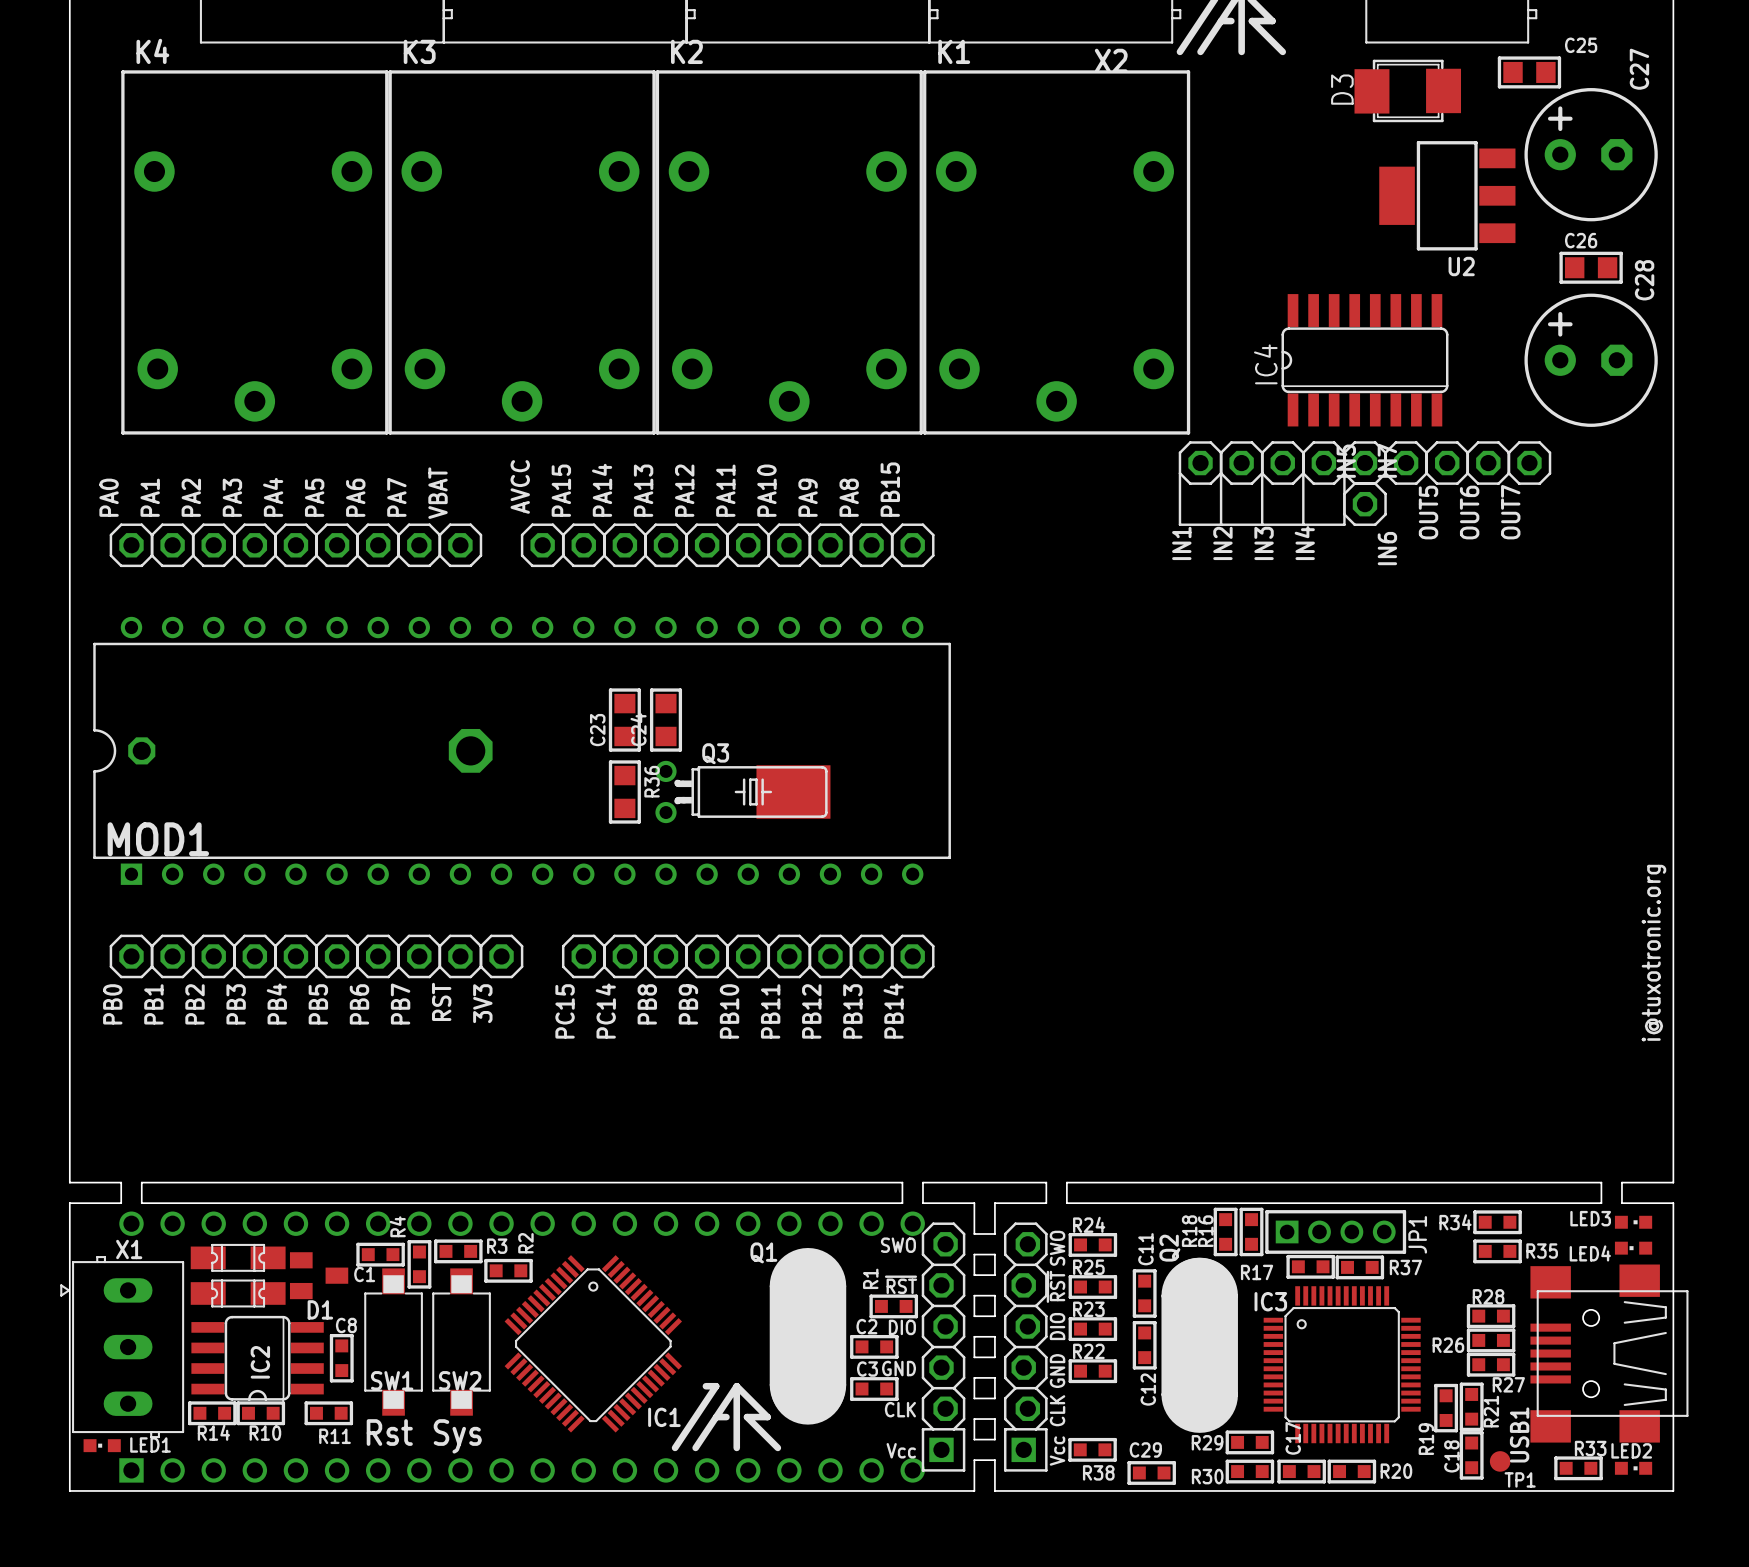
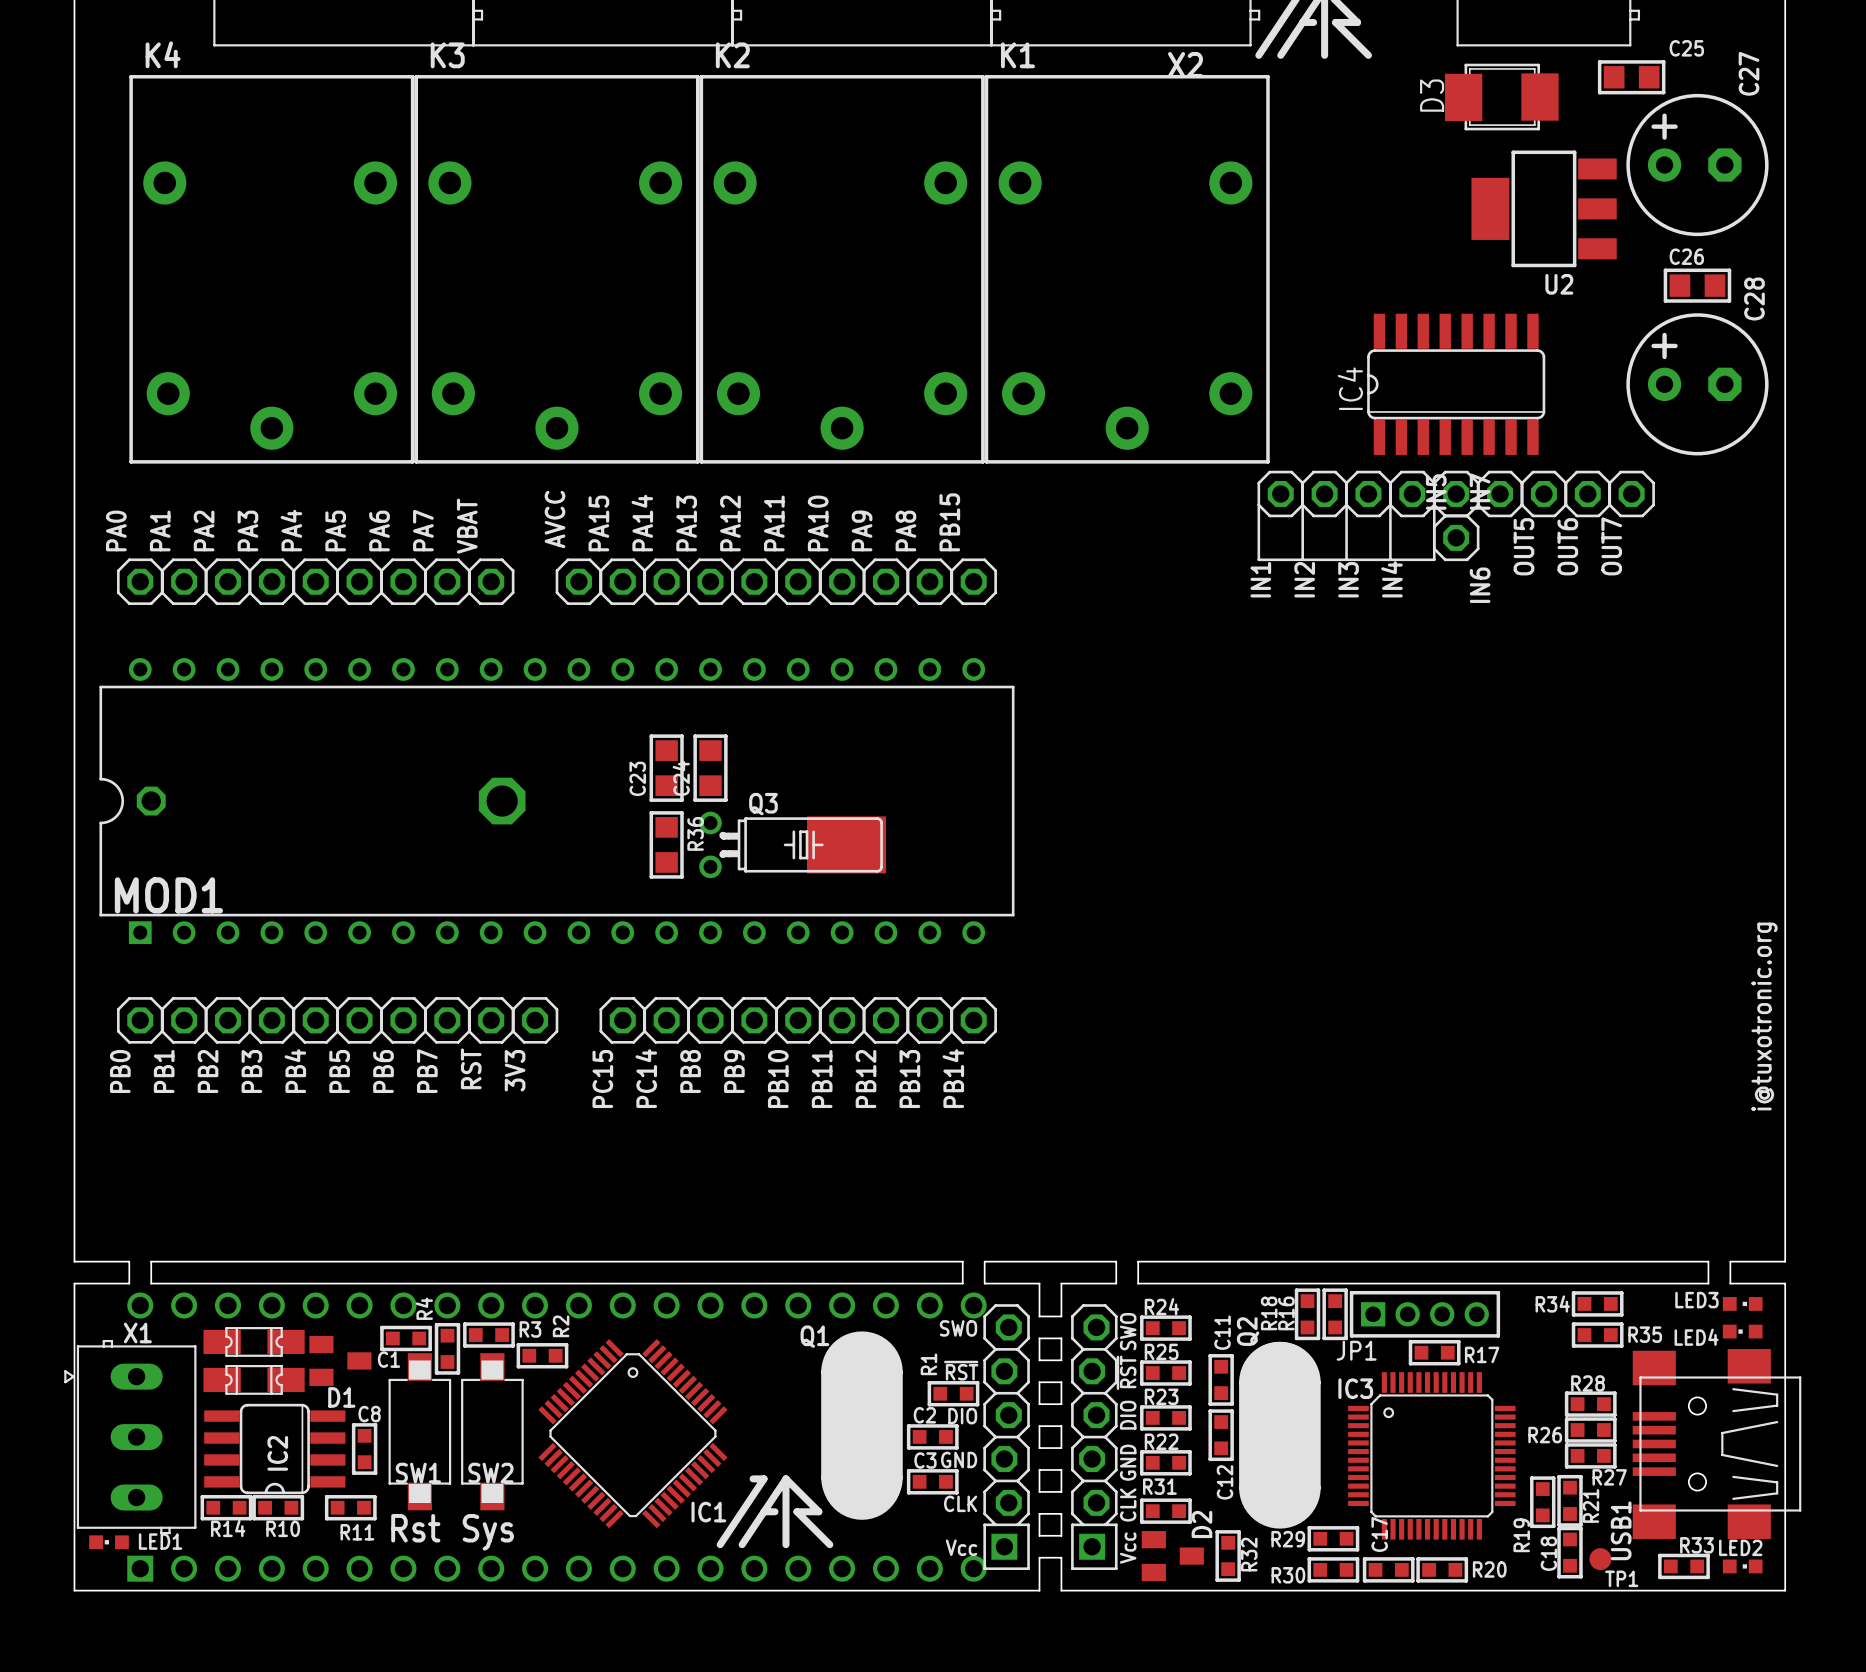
JP1 name rotation: 0° (1417, 1234) -> 90° clockwise (1356, 1350)
JP1 name position: JP1 (1417, 1234) -> JP1 (1356, 1350)
R17 position: (1310, 1266) -> (1434, 1352)
R37: (1359, 1267) -> none
R17 name position: R17 (1257, 1272) -> R17 (1482, 1354)
R31: none -> (1165, 1511)
R38: (1092, 1449) -> none
D2: none -> (1172, 1556)
R32: none -> (1228, 1555)
C29: (1151, 1472) -> none

